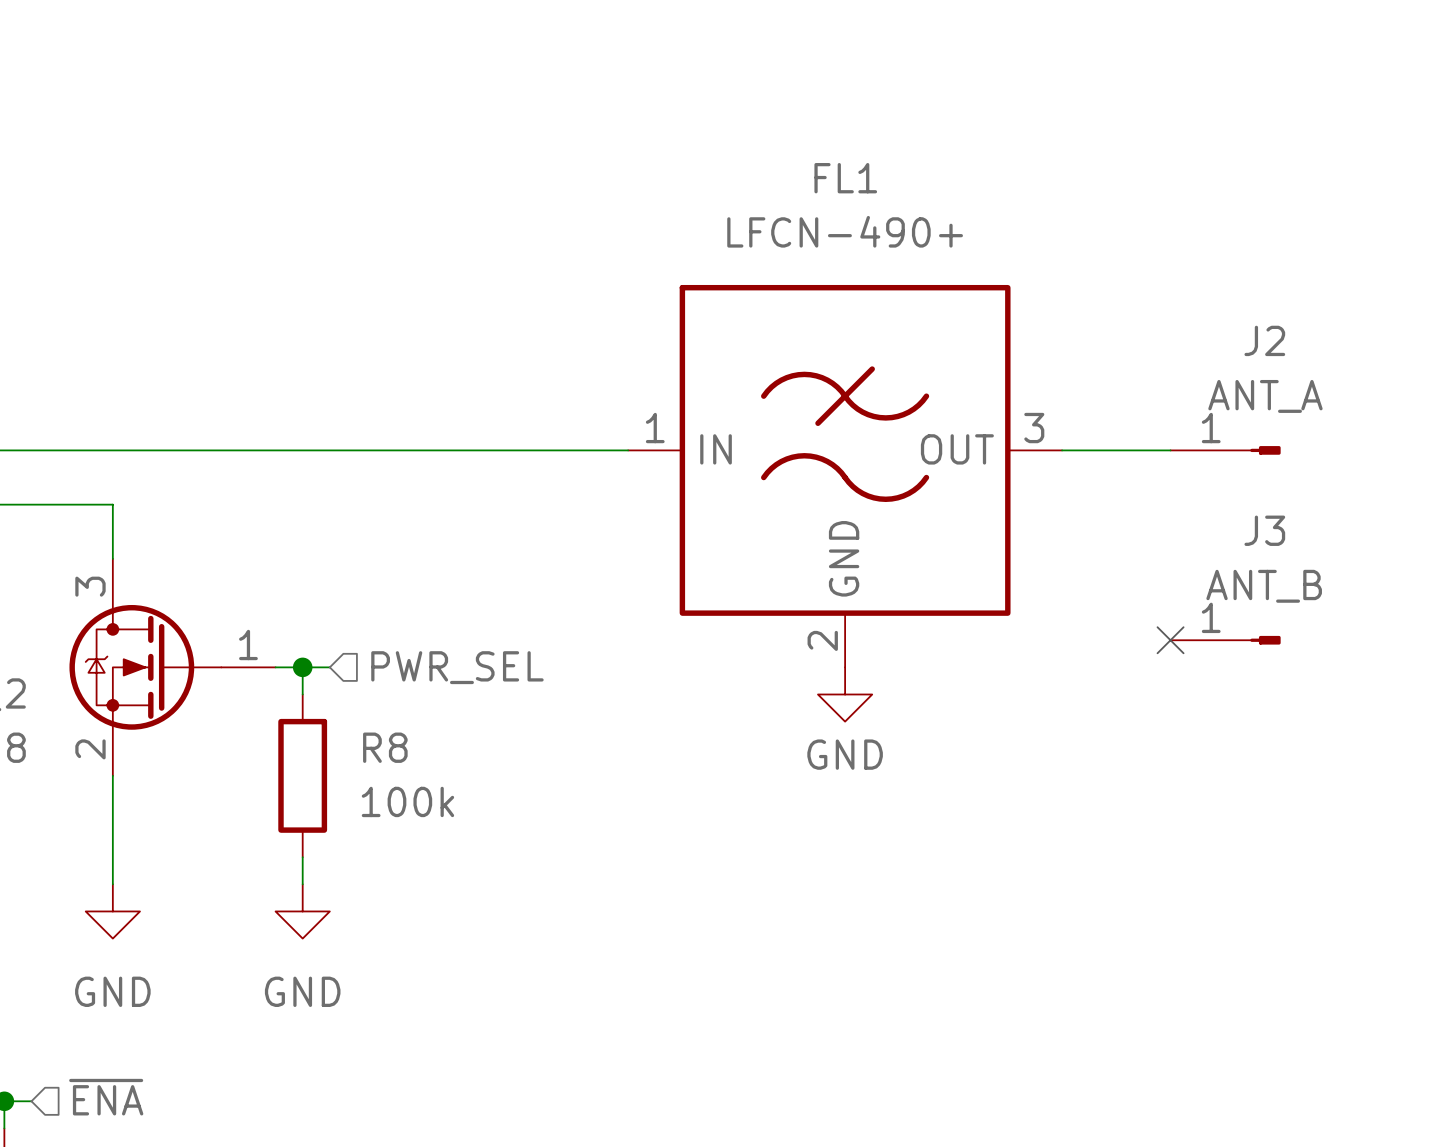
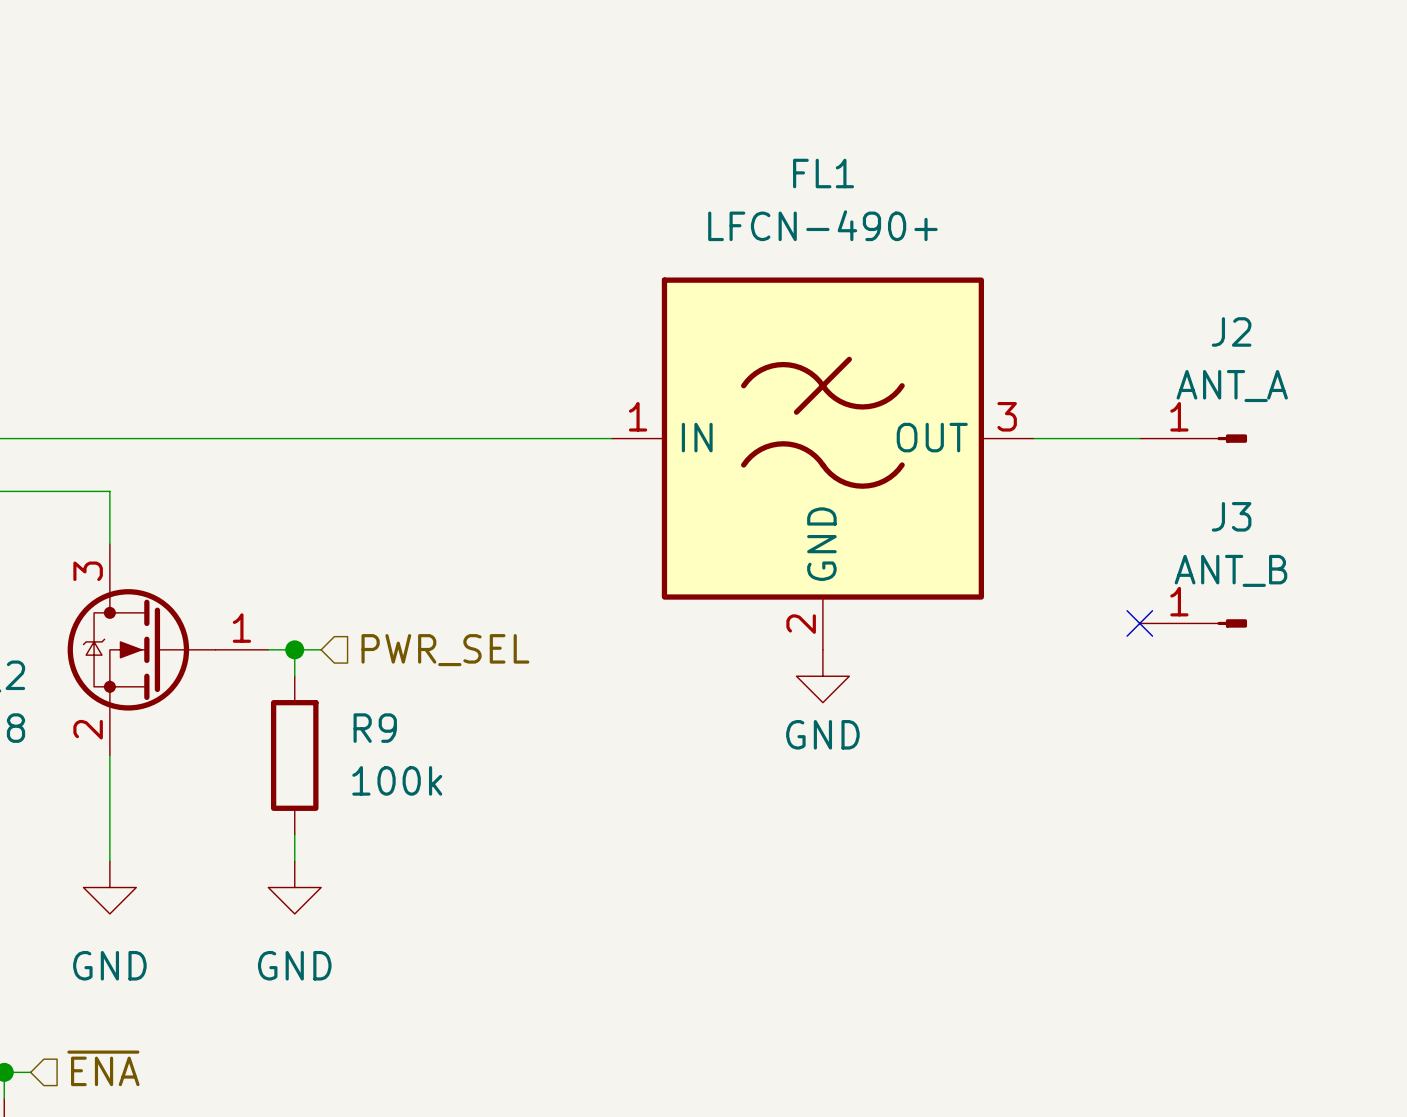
R8 name: R8 (385, 747) -> R9 (375, 728)

